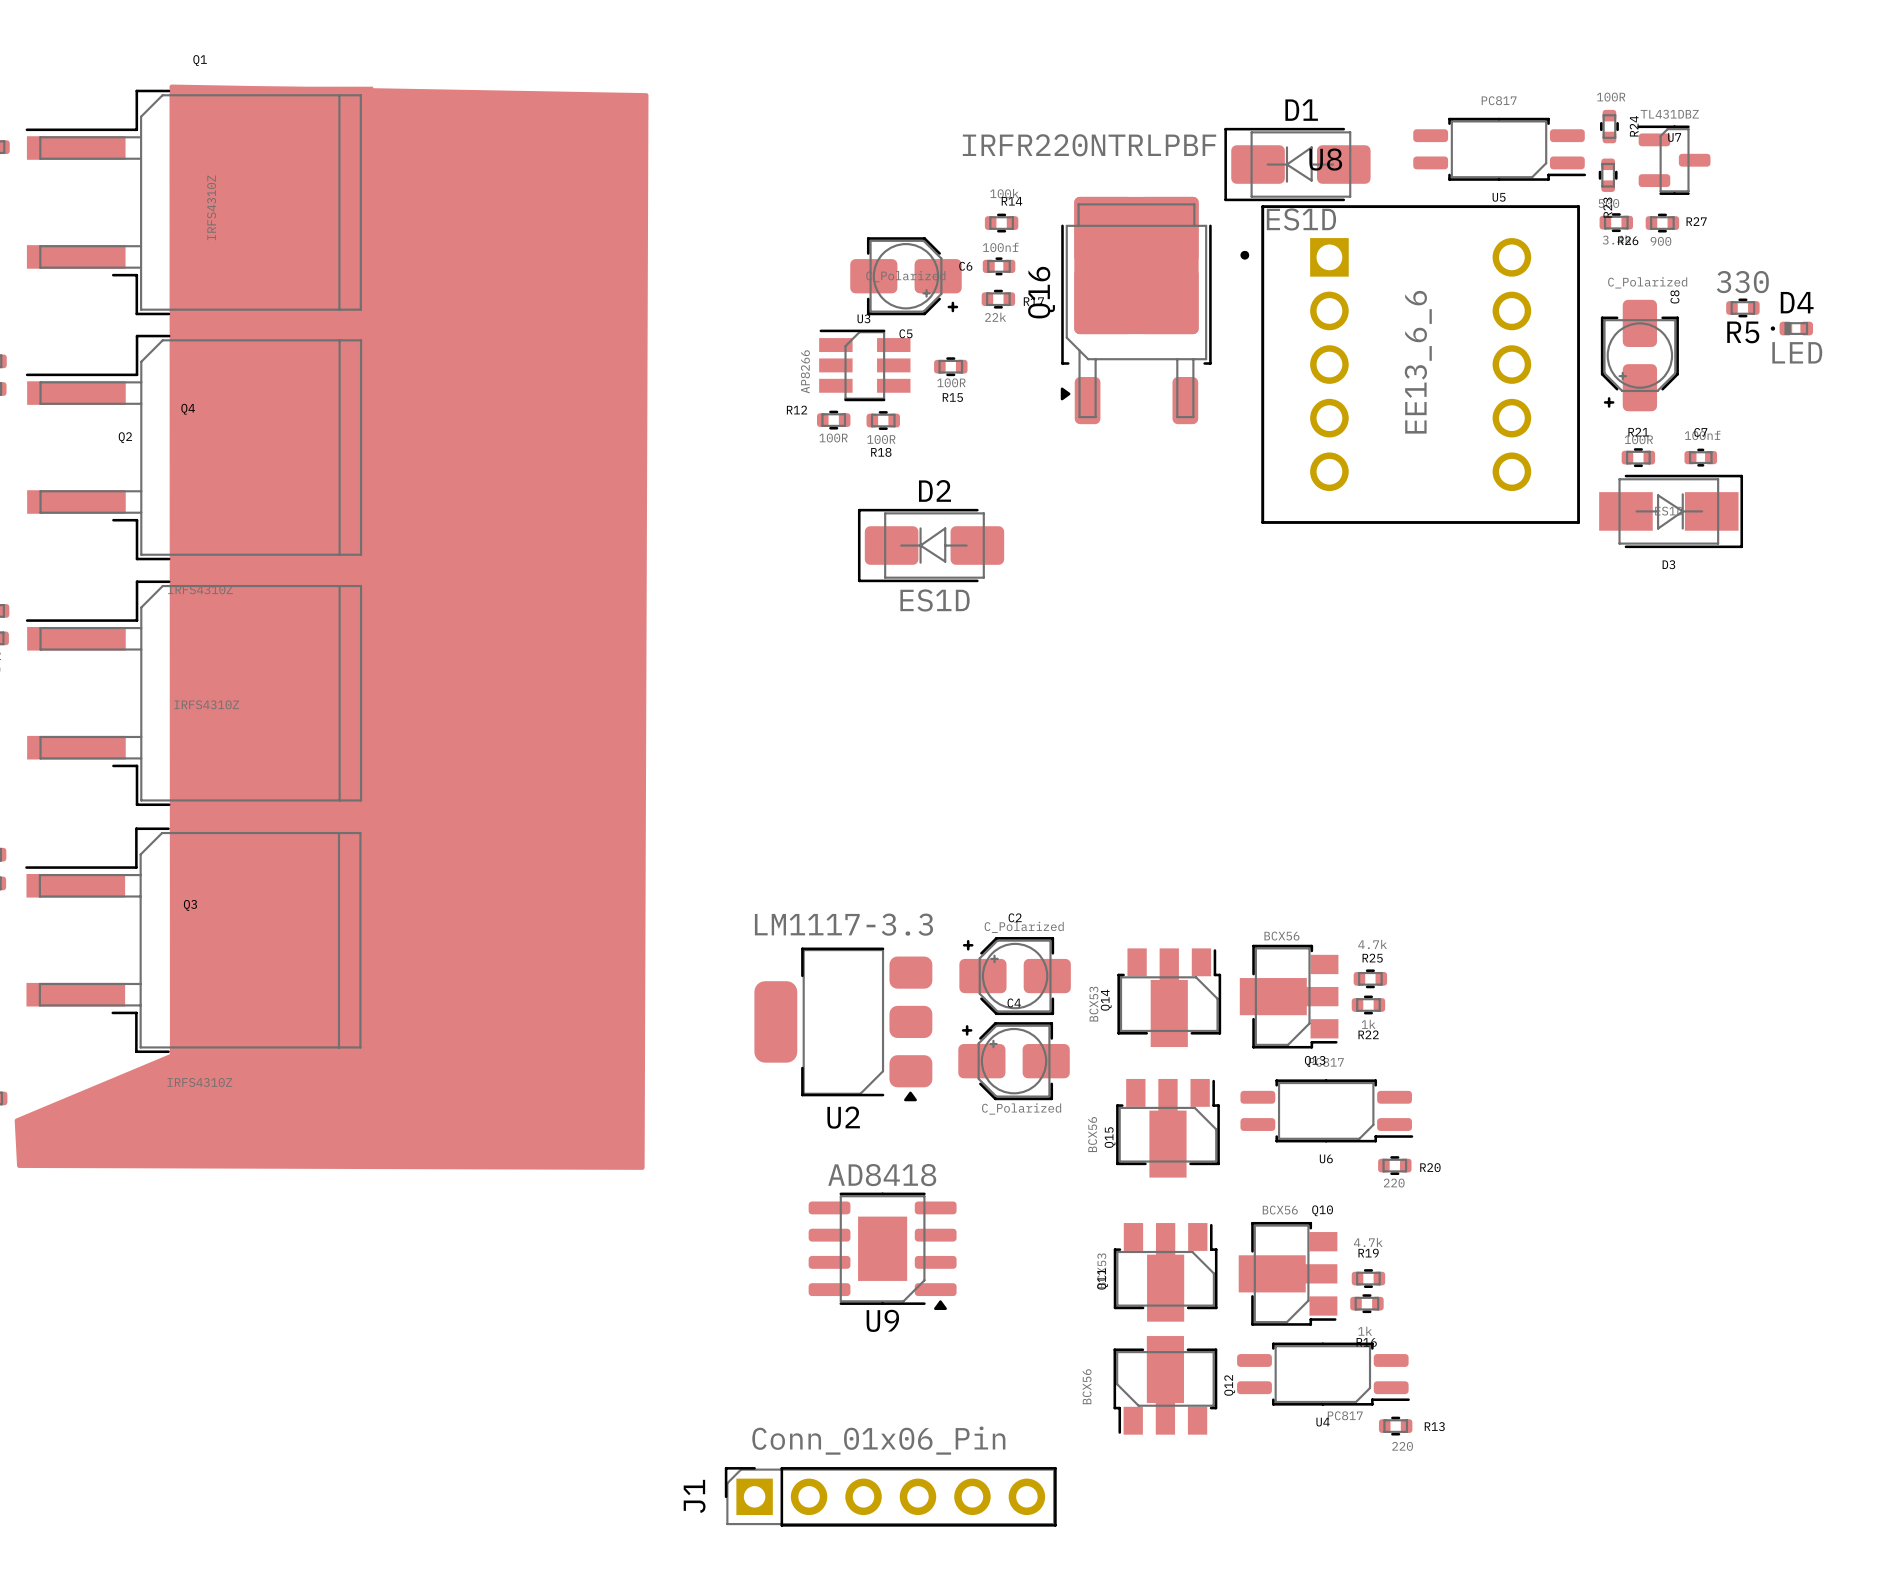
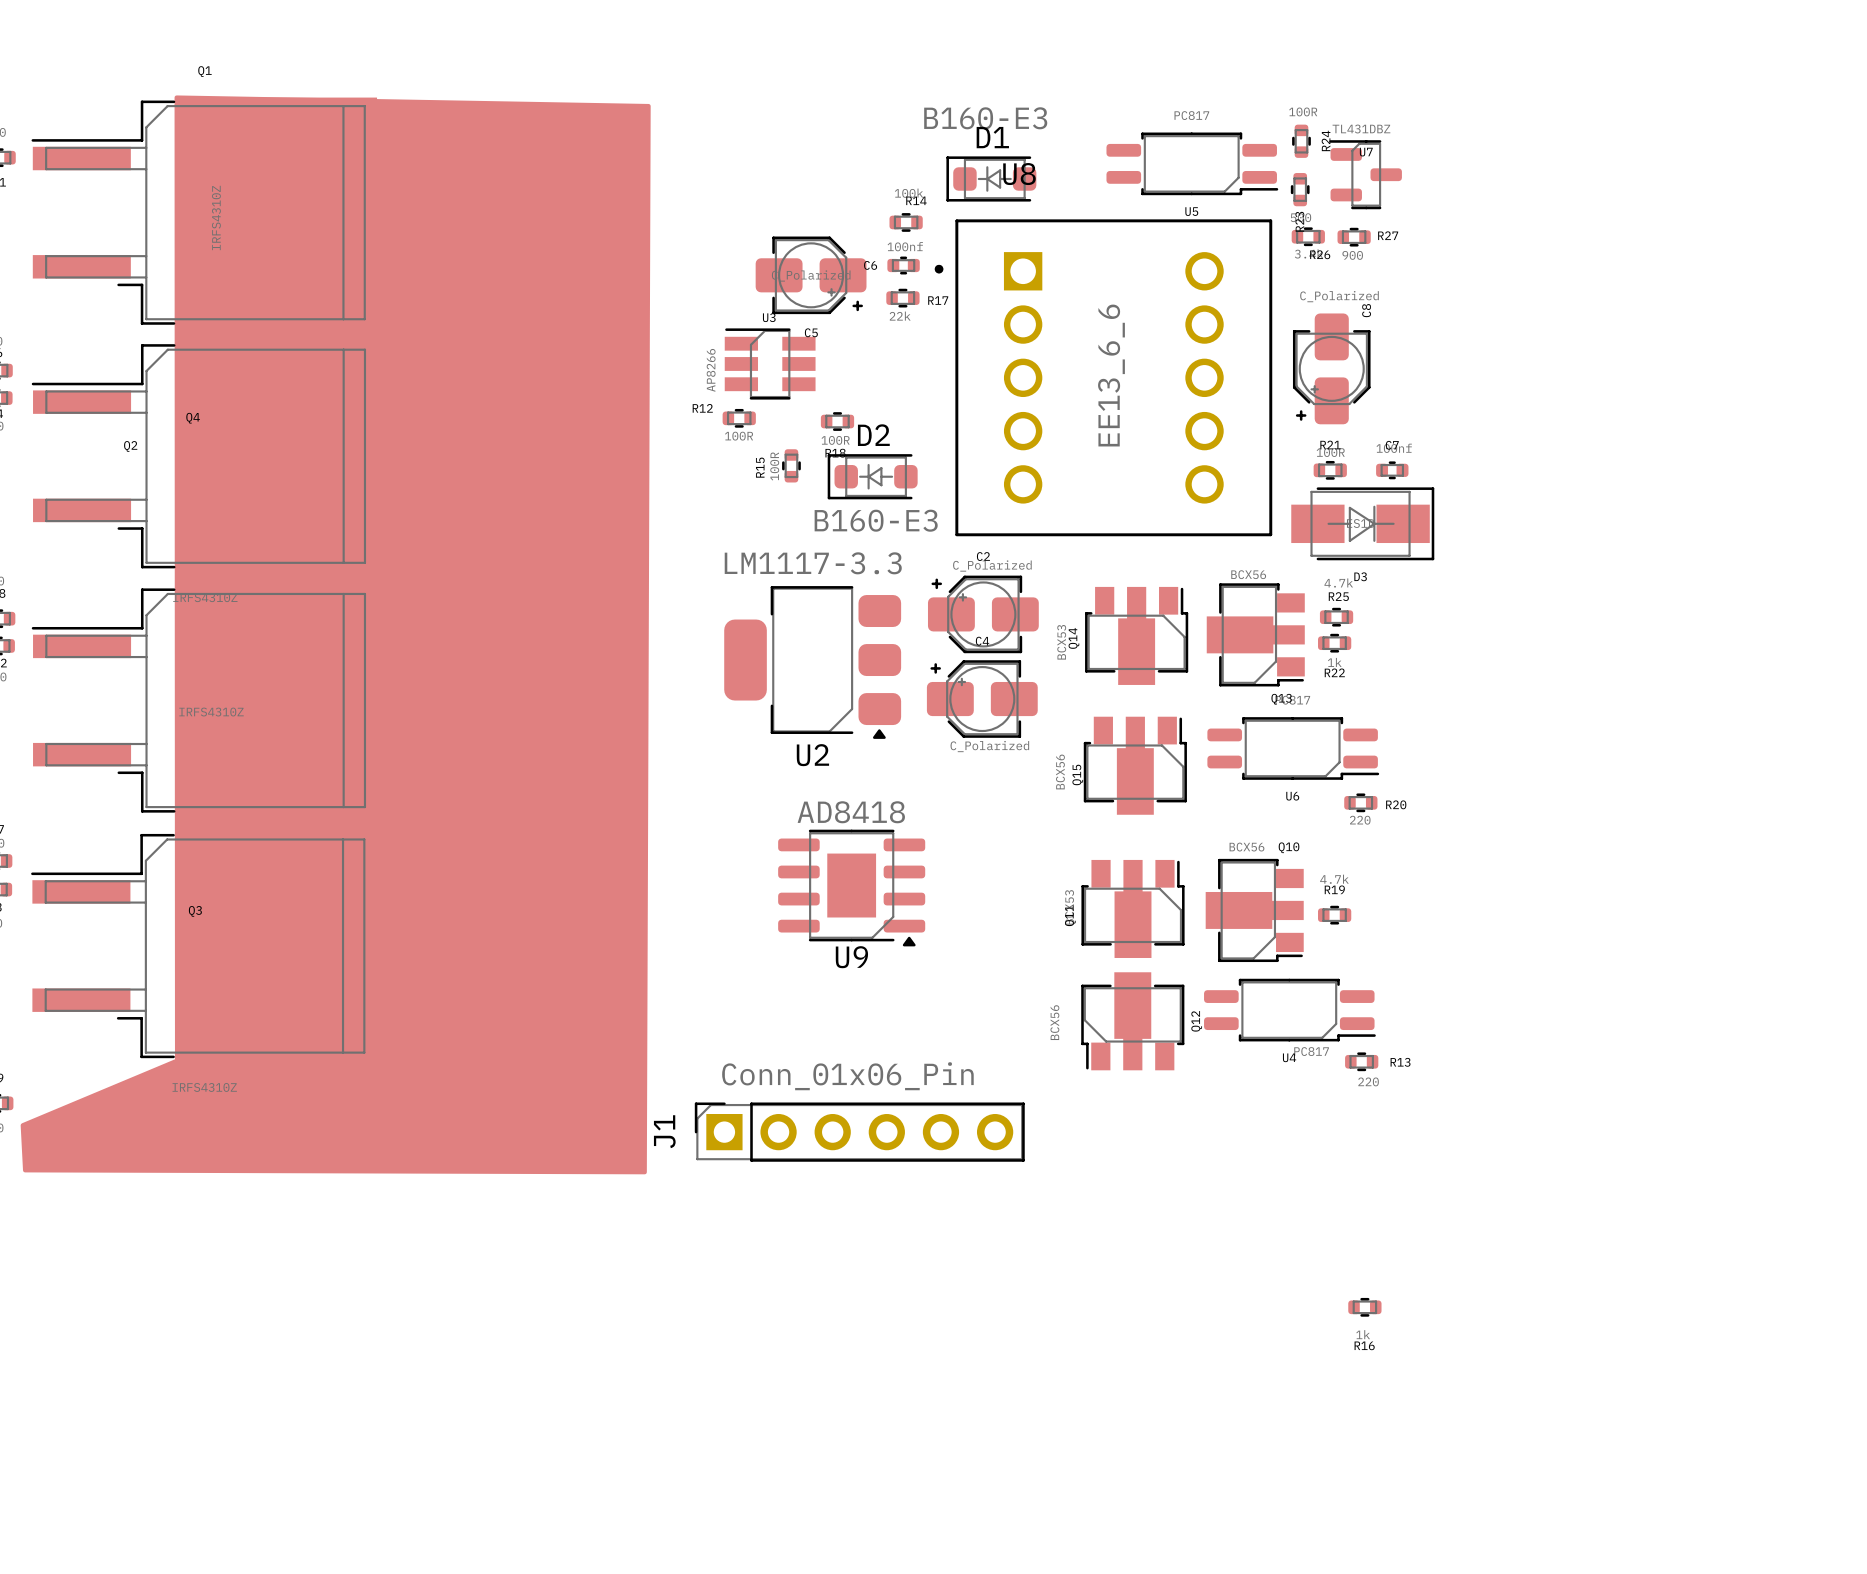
R24 position: (1609, 126) -> (1301, 141)
D1 footprint: [1224, 127, 1371, 202] -> [946, 156, 1037, 202]
U5 position: (1499, 149) -> (1192, 163)
U7 position: (1673, 160) -> (1365, 174)
R23 position: (1608, 175) -> (1300, 189)
D1 value: ES1D (1301, 219) -> B160-E3 (985, 118)
R26 position: (1616, 222) -> (1308, 236)
R14 position: (1001, 223) -> (906, 222)
R27 position: (1662, 223) -> (1354, 237)
C6 position: (999, 266) -> (903, 265)
C5 position: (905, 276) -> (811, 275)
R17 position: (998, 299) -> (902, 298)
R5: 330 (1742, 307) -> none
Q16: IRFR220NTRLPBF (1136, 310) -> none
D4: LED (1791, 328) -> none
C8 position: (1639, 355) -> (1331, 368)
U8 position: (1410, 364) -> (1103, 377)
U3 position: (864, 365) -> (770, 363)
R15 rotation: 0° (950, 366) -> 90° clockwise (791, 465)
R15 position: (950, 366) -> (791, 465)
R12 position: (833, 420) -> (739, 418)
R18 position: (883, 420) -> (837, 421)
R21 position: (1638, 457) -> (1330, 470)
C7 position: (1700, 457) -> (1392, 470)
D2 footprint: [857, 508, 1005, 583] -> [827, 454, 918, 500]
D3 position: (1671, 511) -> (1362, 523)
D2 value: ES1D (935, 600) -> B160-E3 (876, 520)
C2 position: (1015, 976) -> (983, 614)
R25 position: (1370, 978) -> (1336, 617)
Q13 position: (1289, 996) -> (1255, 634)
Q14 position: (1169, 997) -> (1136, 635)
R22 position: (1368, 1004) -> (1334, 643)
U2 position: (843, 1024) -> (812, 662)
C4 position: (1014, 1061) -> (982, 699)
U6 position: (1326, 1110) -> (1293, 748)
Q15 position: (1167, 1128) -> (1135, 765)
R20 position: (1394, 1165) -> (1360, 802)
U9 position: (882, 1251) -> (851, 888)
Q11 position: (1165, 1272) -> (1133, 908)
Q10 position: (1288, 1273) -> (1254, 910)
R19 position: (1368, 1278) -> (1334, 915)
U4 position: (1323, 1374) -> (1289, 1010)
Q12 position: (1165, 1385) -> (1132, 1021)
R13 position: (1395, 1426) -> (1361, 1061)
J1 position: (890, 1496) -> (859, 1132)

